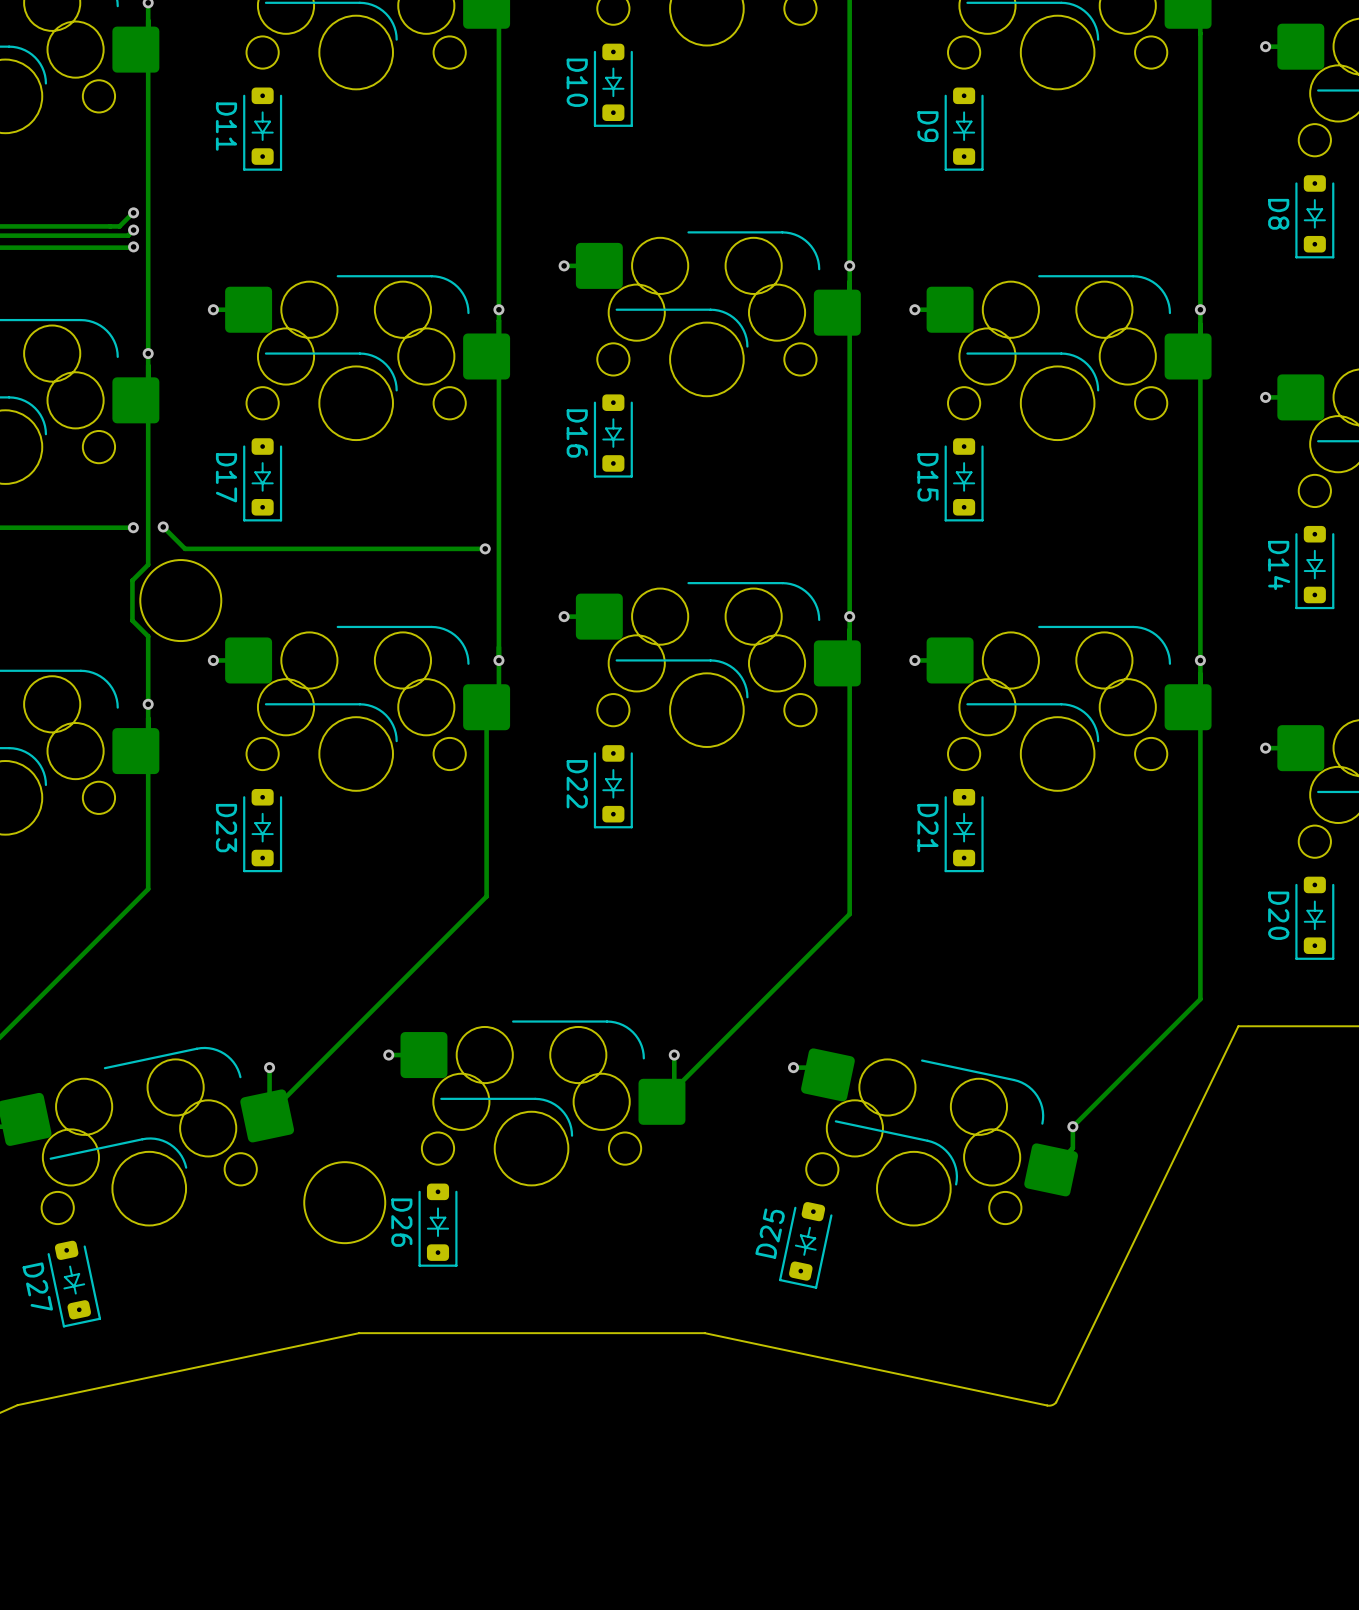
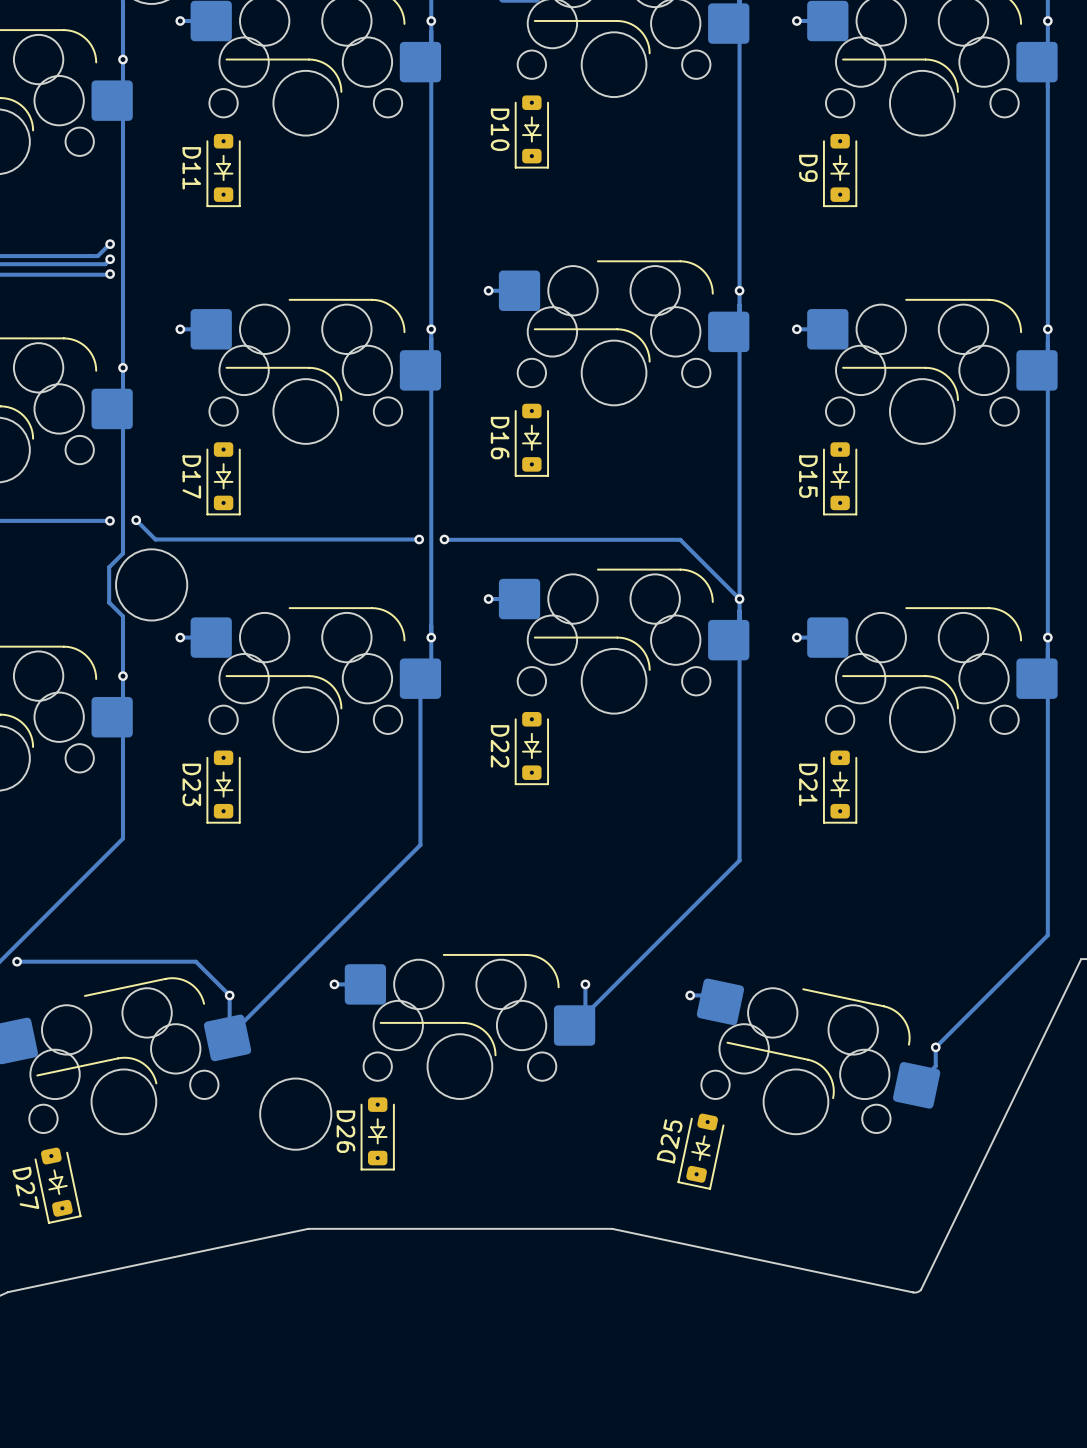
track: none -> (444, 539) (680, 539) (739, 599)
via: none -> (444, 539)
track: none -> (17, 961) (195, 961) (229, 995)
via: none -> (17, 961)

